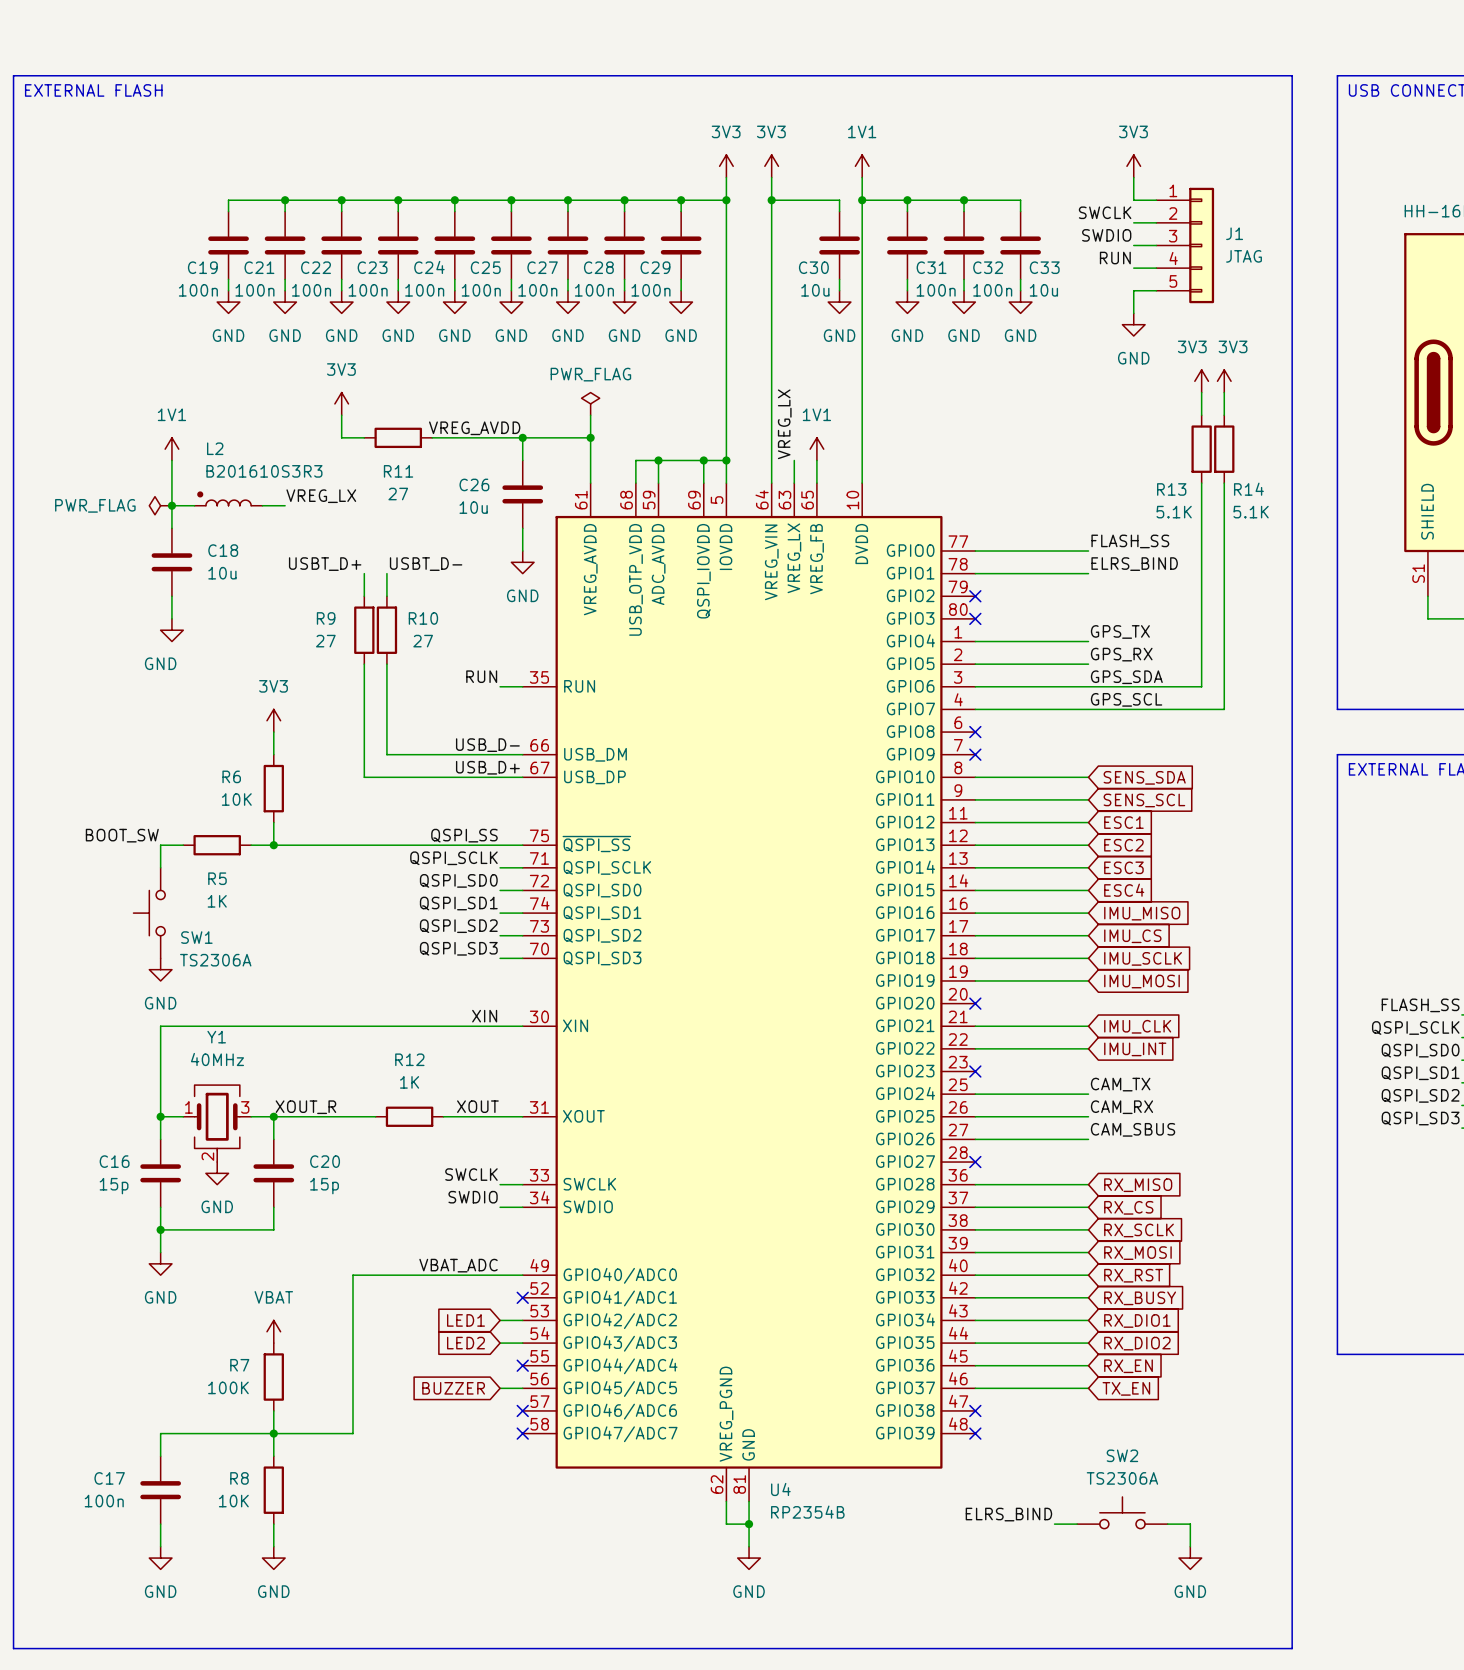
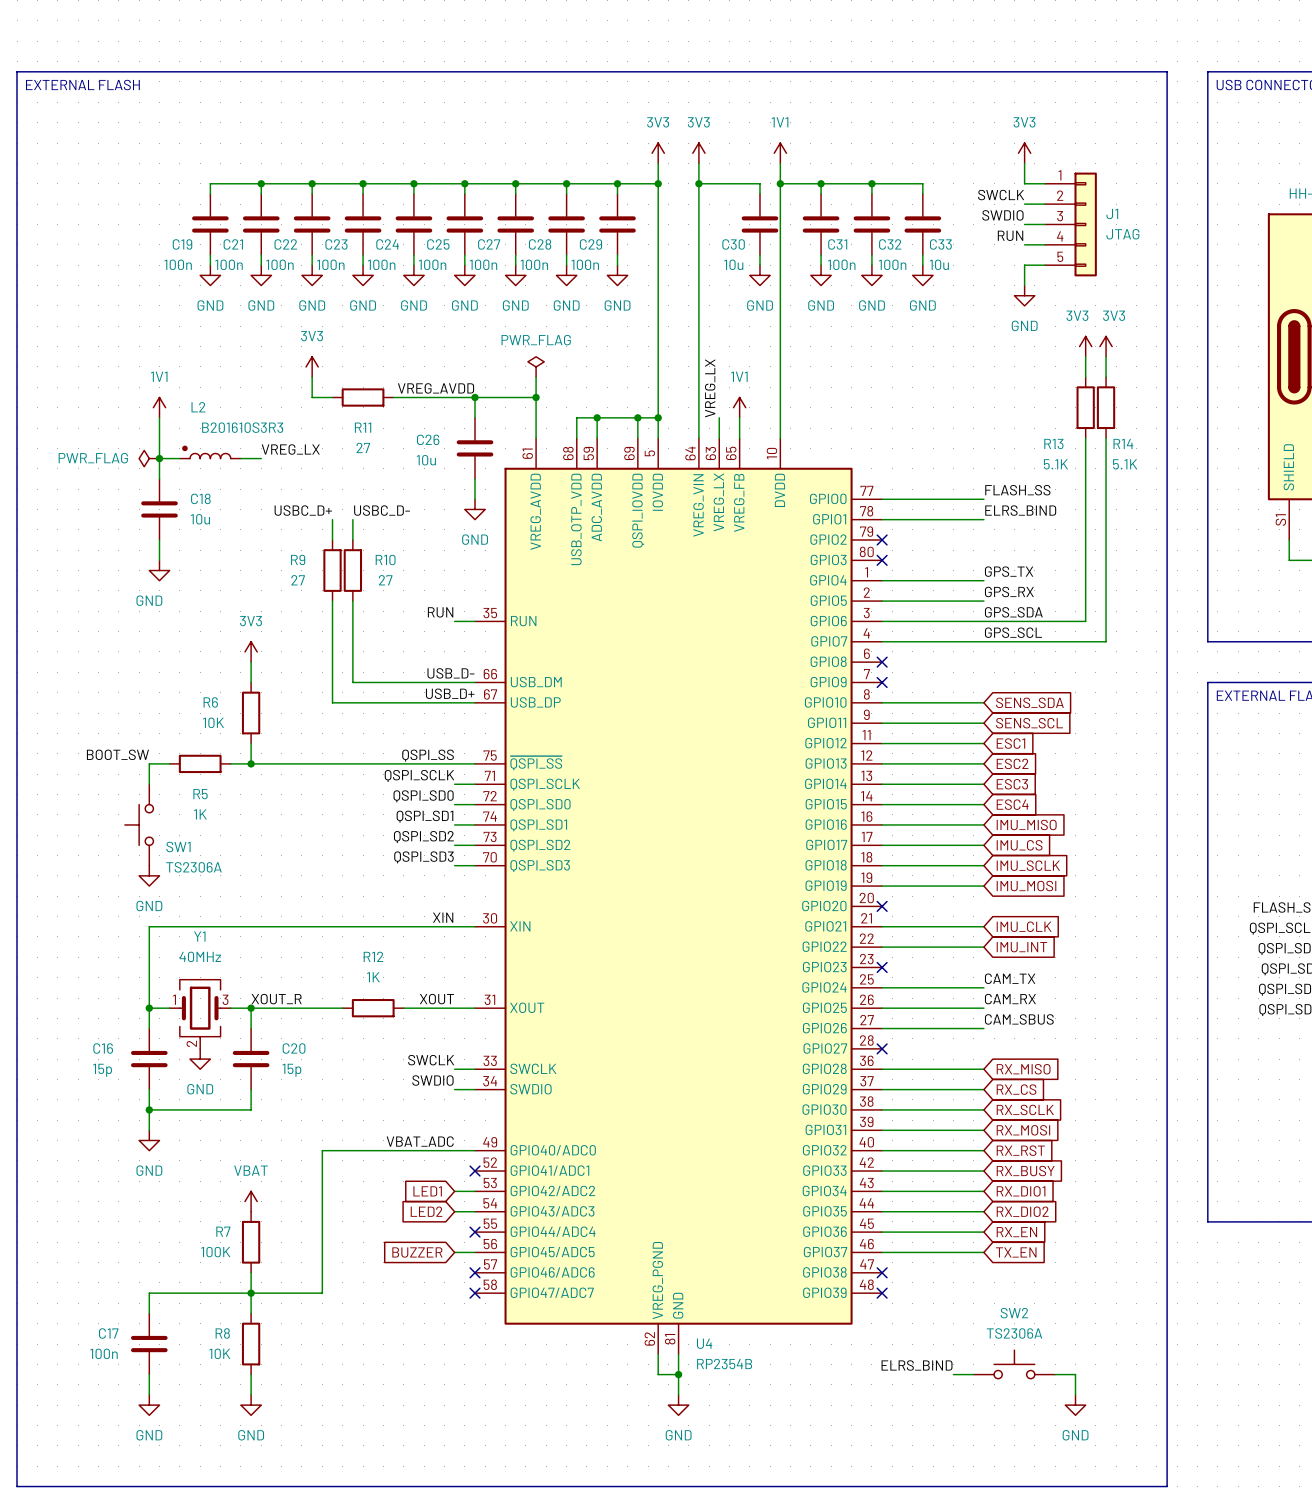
label: USBT_D+ (325, 564) -> USBC_D+ (303, 510)
label: USBT_D- (426, 564) -> USBC_D- (382, 510)

